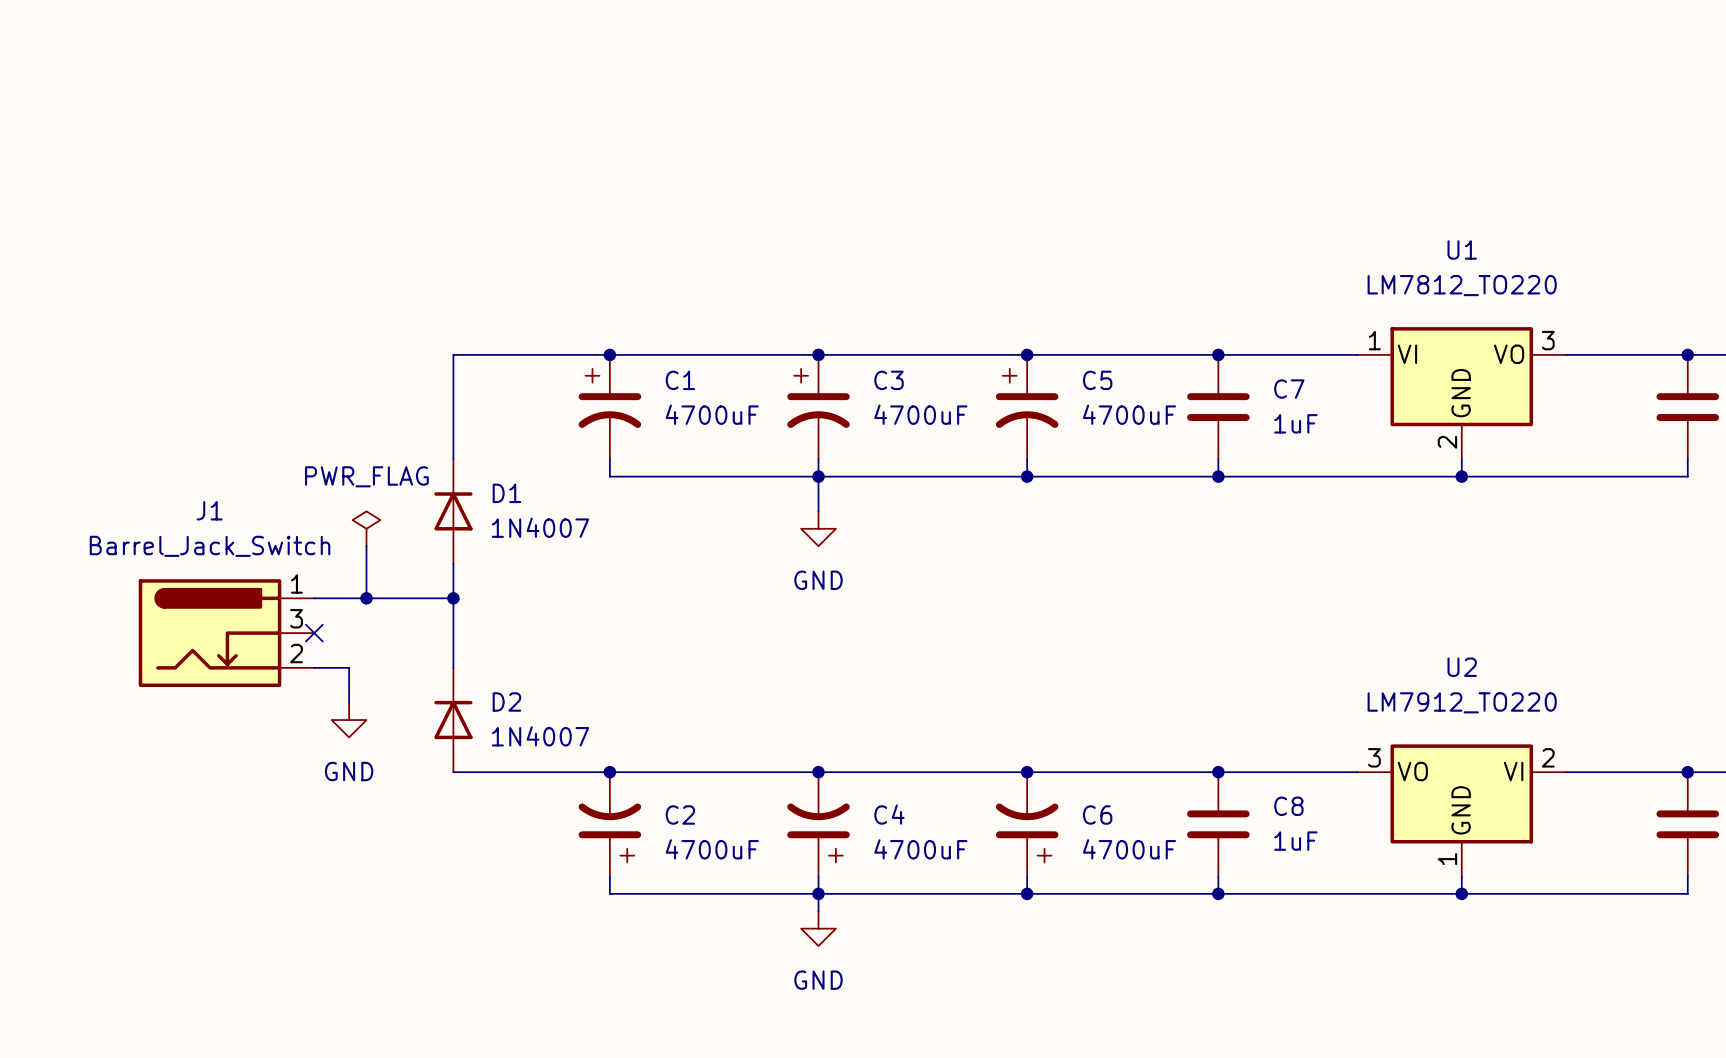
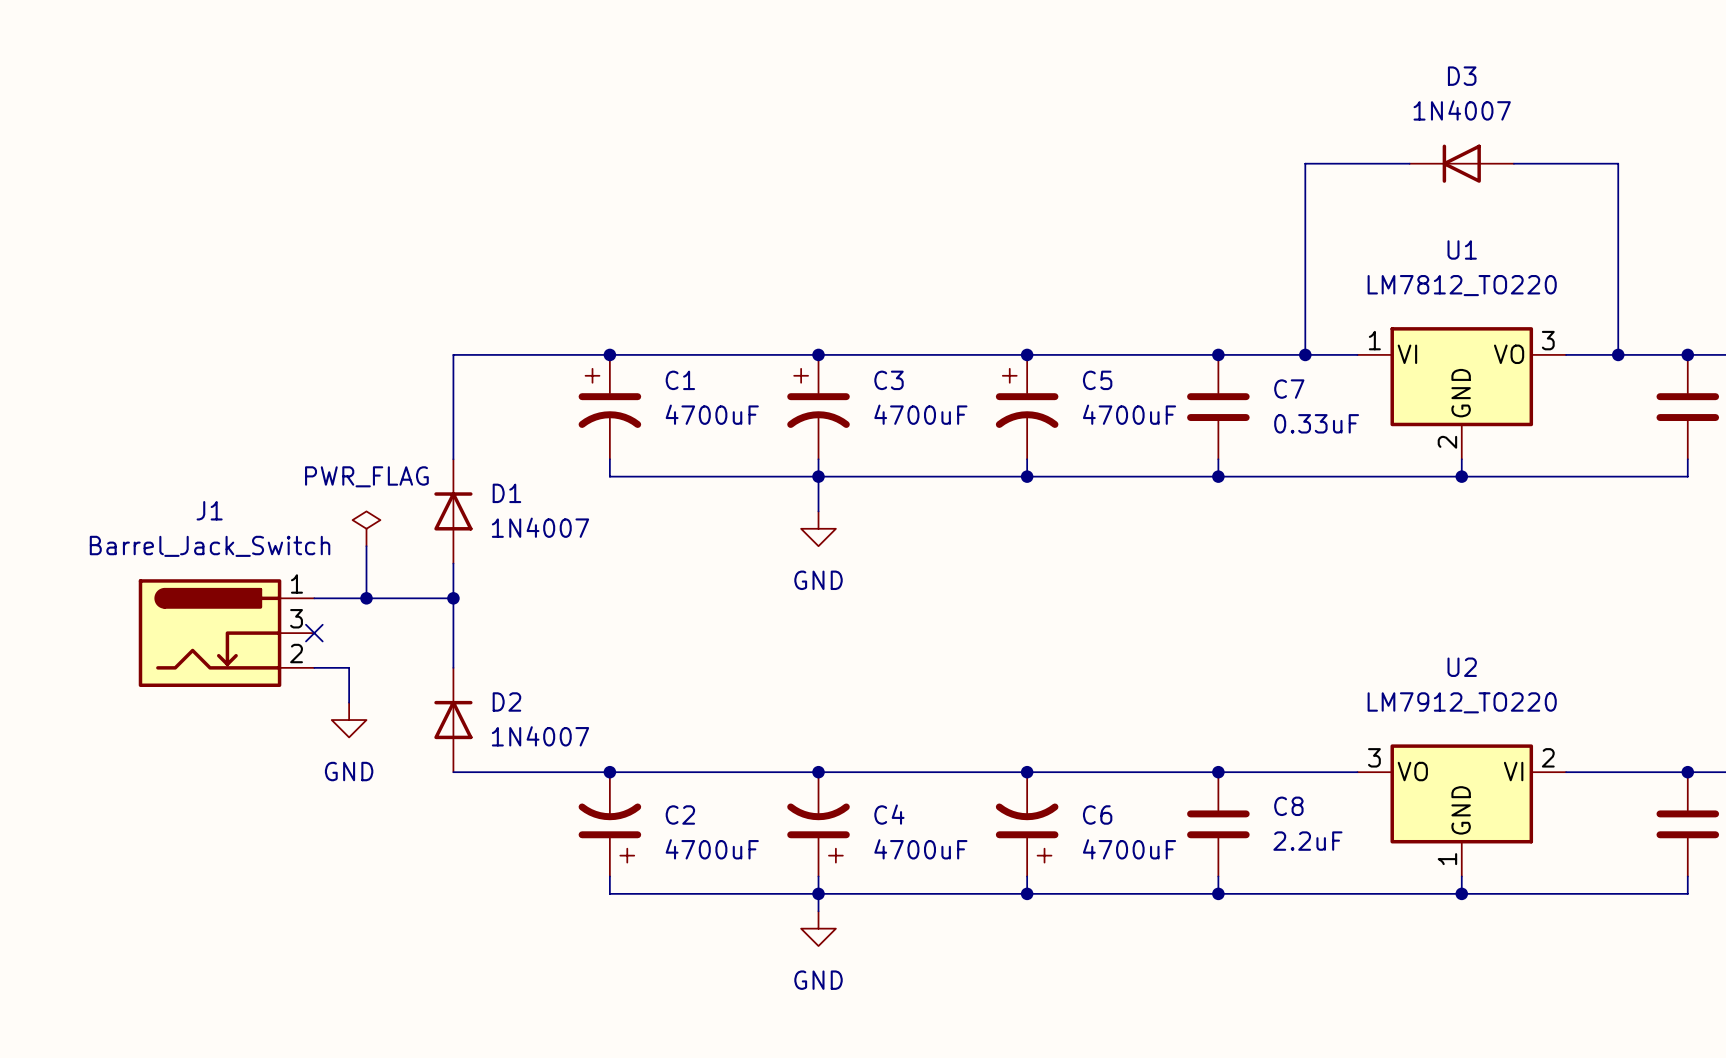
wire: none -> (1409, 163) (1305, 163) (1305, 354)
D3: none -> 1N4007 (1461, 163)
wire: none -> (1513, 163) (1618, 163) (1618, 354)
junction: none -> (1305, 354)
junction: none -> (1618, 354)
C7 value: 1uF (1295, 423) -> 0.33uF (1316, 423)
C8 value: 1uF (1295, 841) -> 2.2uF (1307, 841)

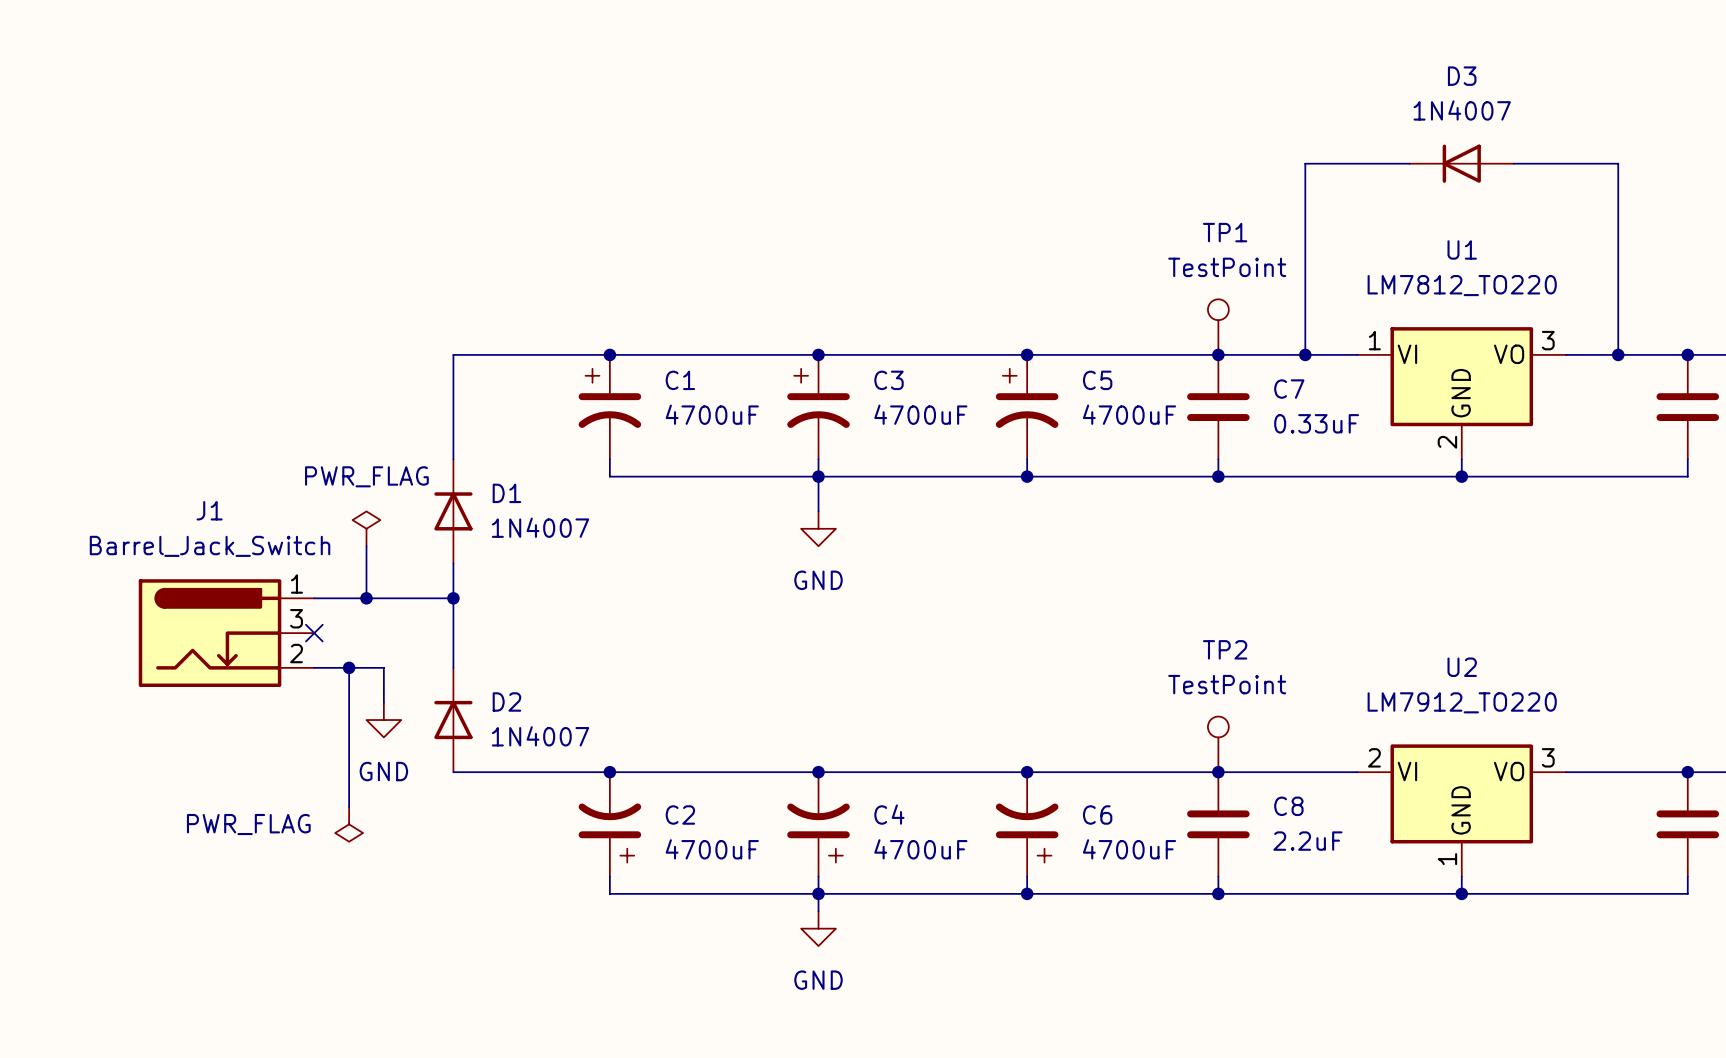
TP1: none -> TestPoint (1218, 327)
wire: none -> (349, 667) (383, 667) (383, 702)
junction: none -> (349, 667)
wire: none -> (349, 702) (349, 806)
power symbol position: GND (349, 720) -> GND (383, 720)
TP2: none -> TestPoint (1218, 744)
U2 flip: as is (1461, 793) -> left-right (1461, 793)
power symbol: none -> PWR_FLAG (349, 824)

